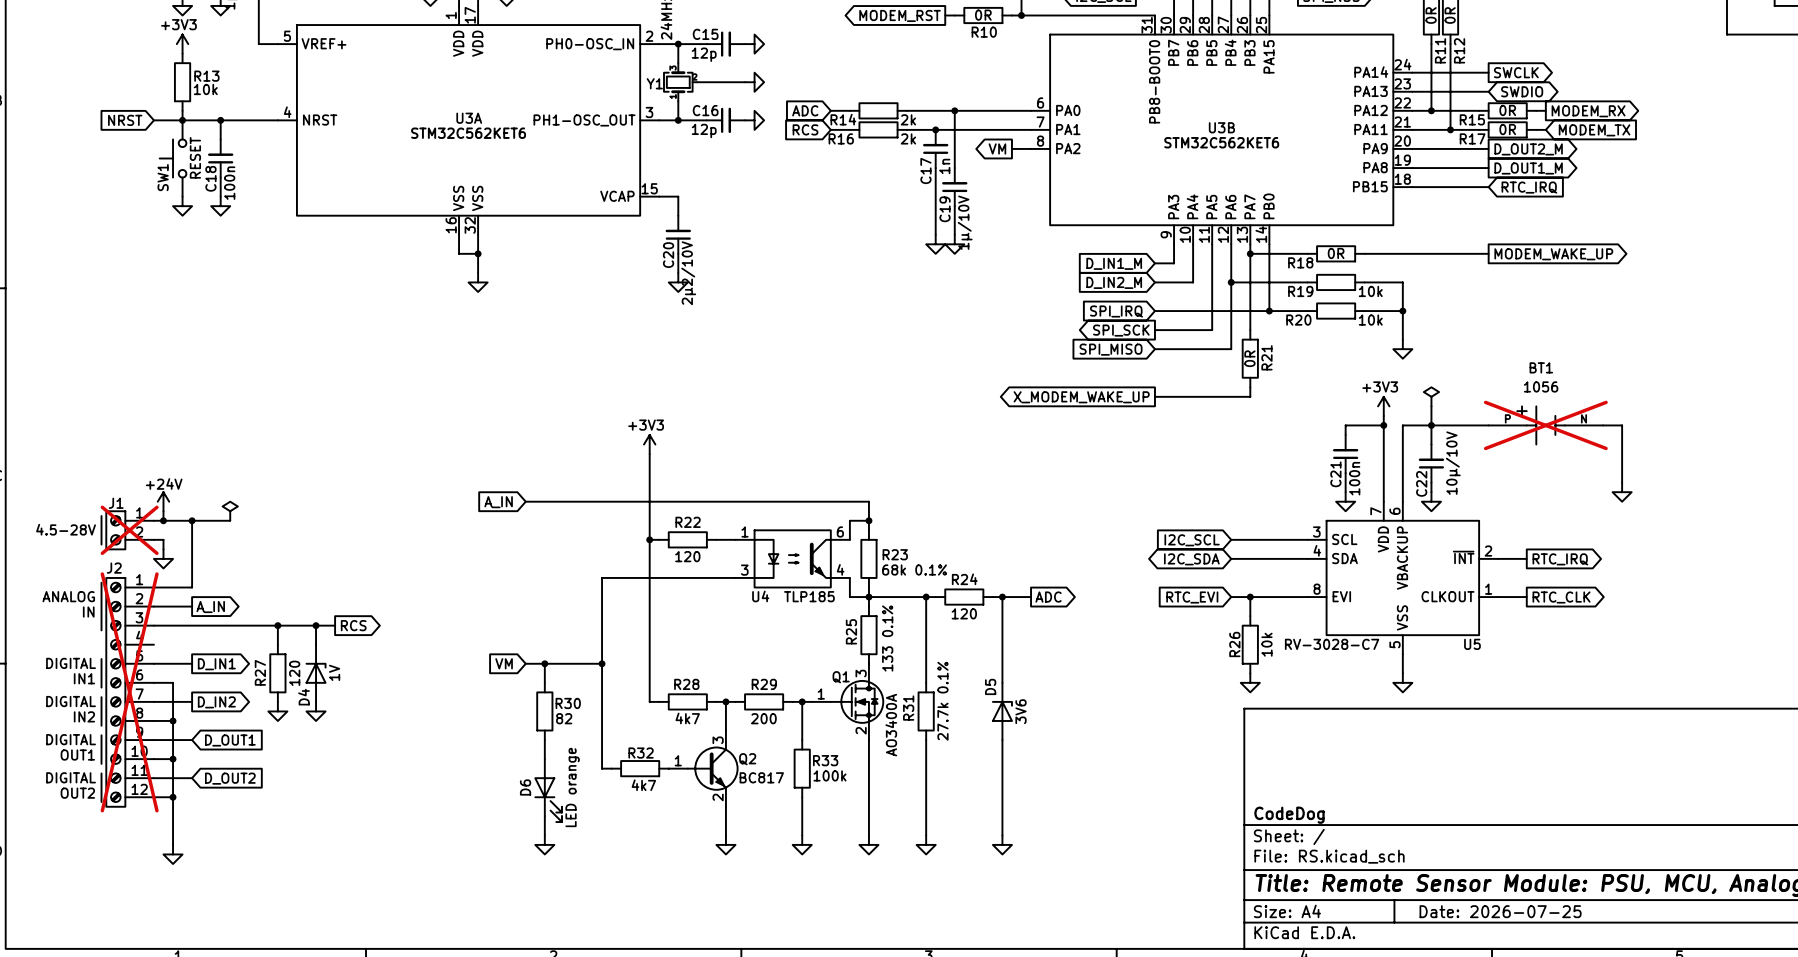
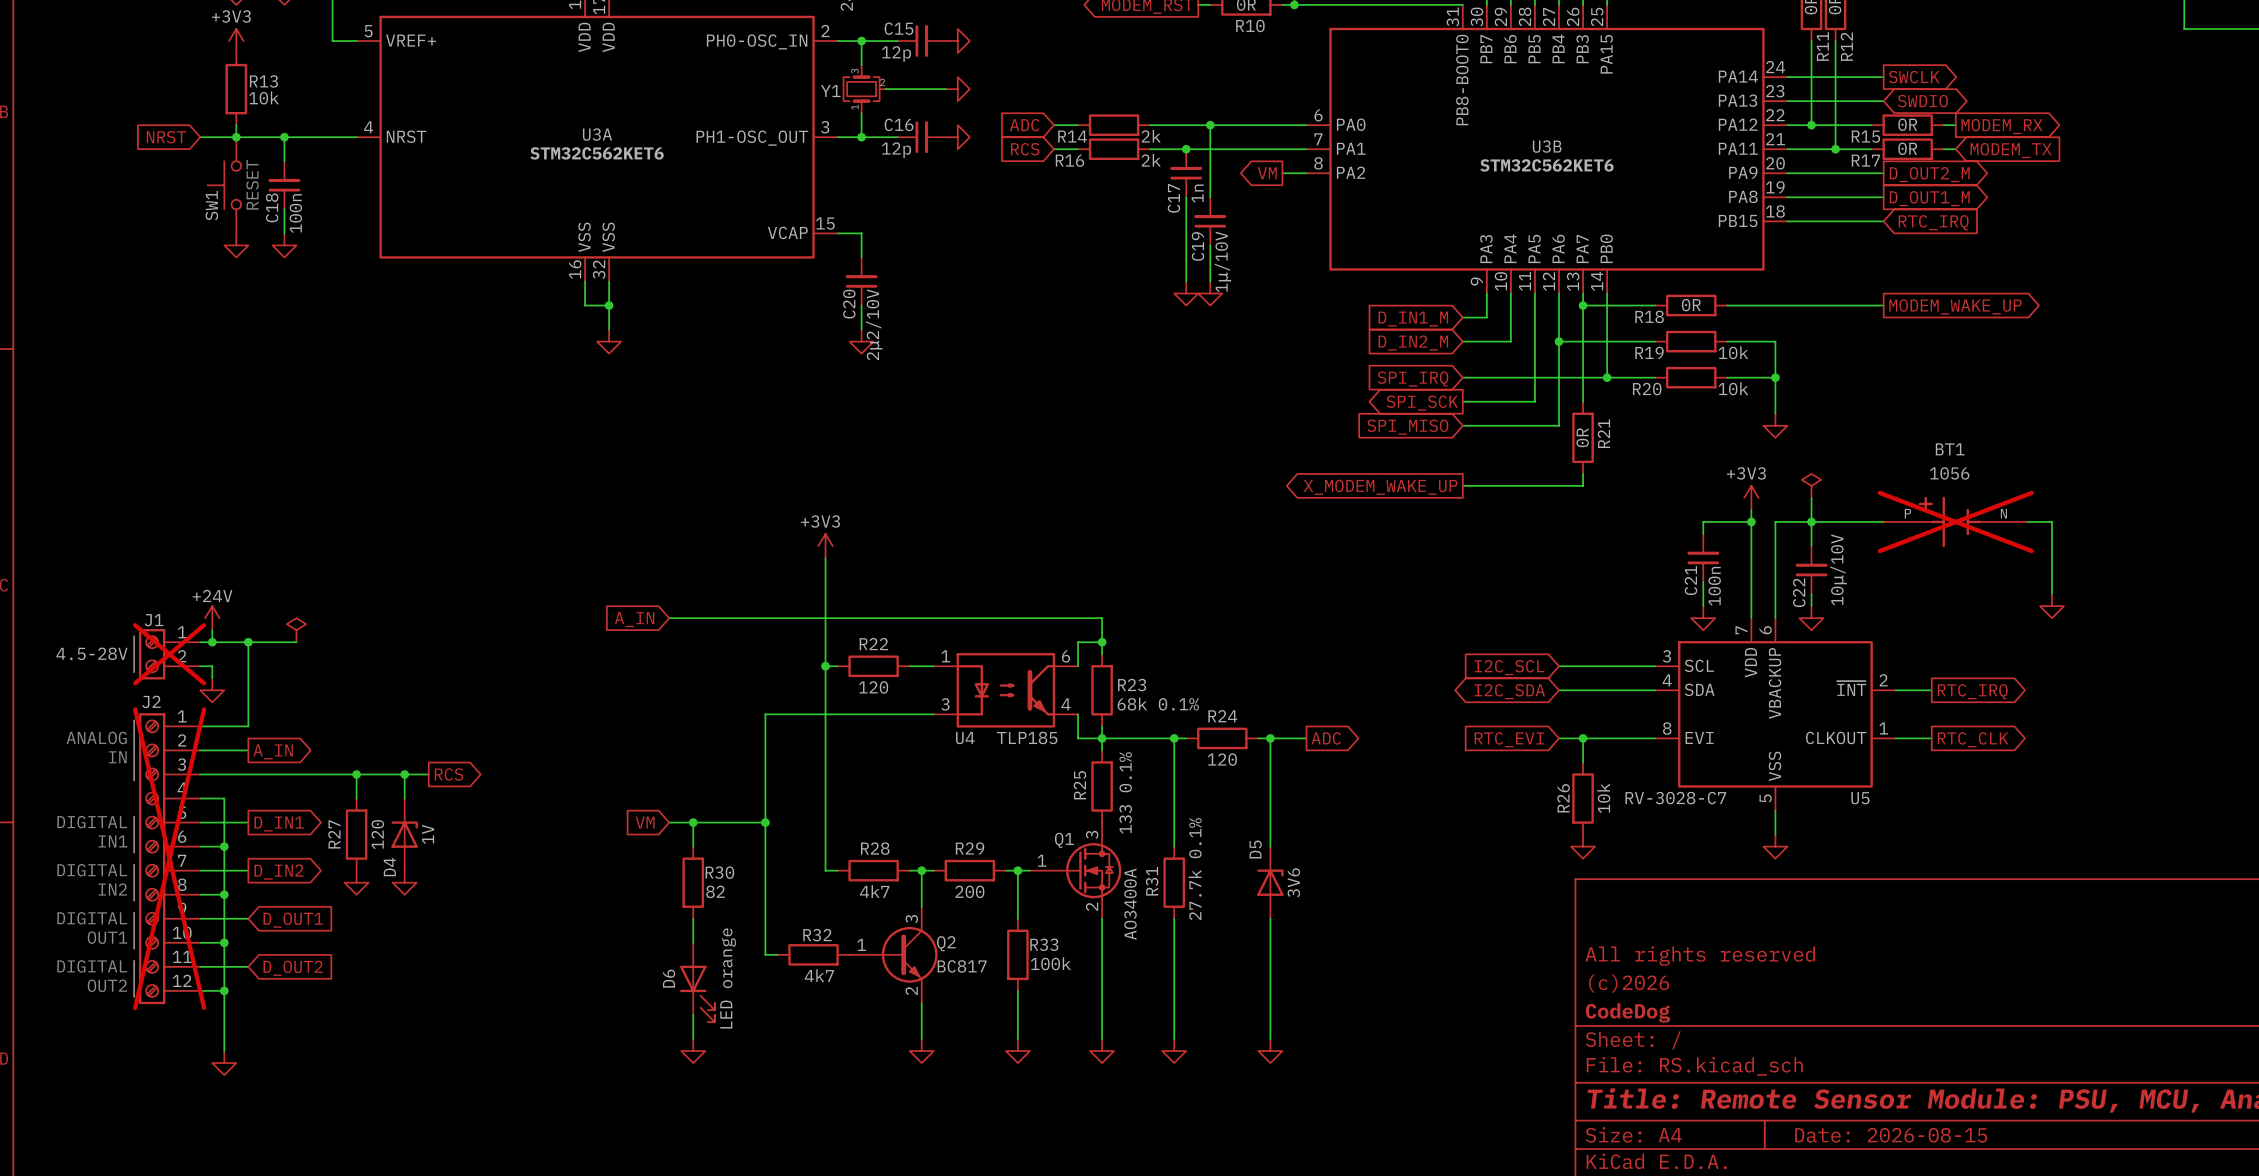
wire: none -> (200, 798) (224, 798) (224, 846)
junction: none -> (224, 846)
title block: none -> All rights reserved (1700, 956)
title block: none -> (c)2026 (1629, 983)
title block: Date: 2026-07-25 (1500, 911) -> Date: 2026-08-15 (1891, 1135)

